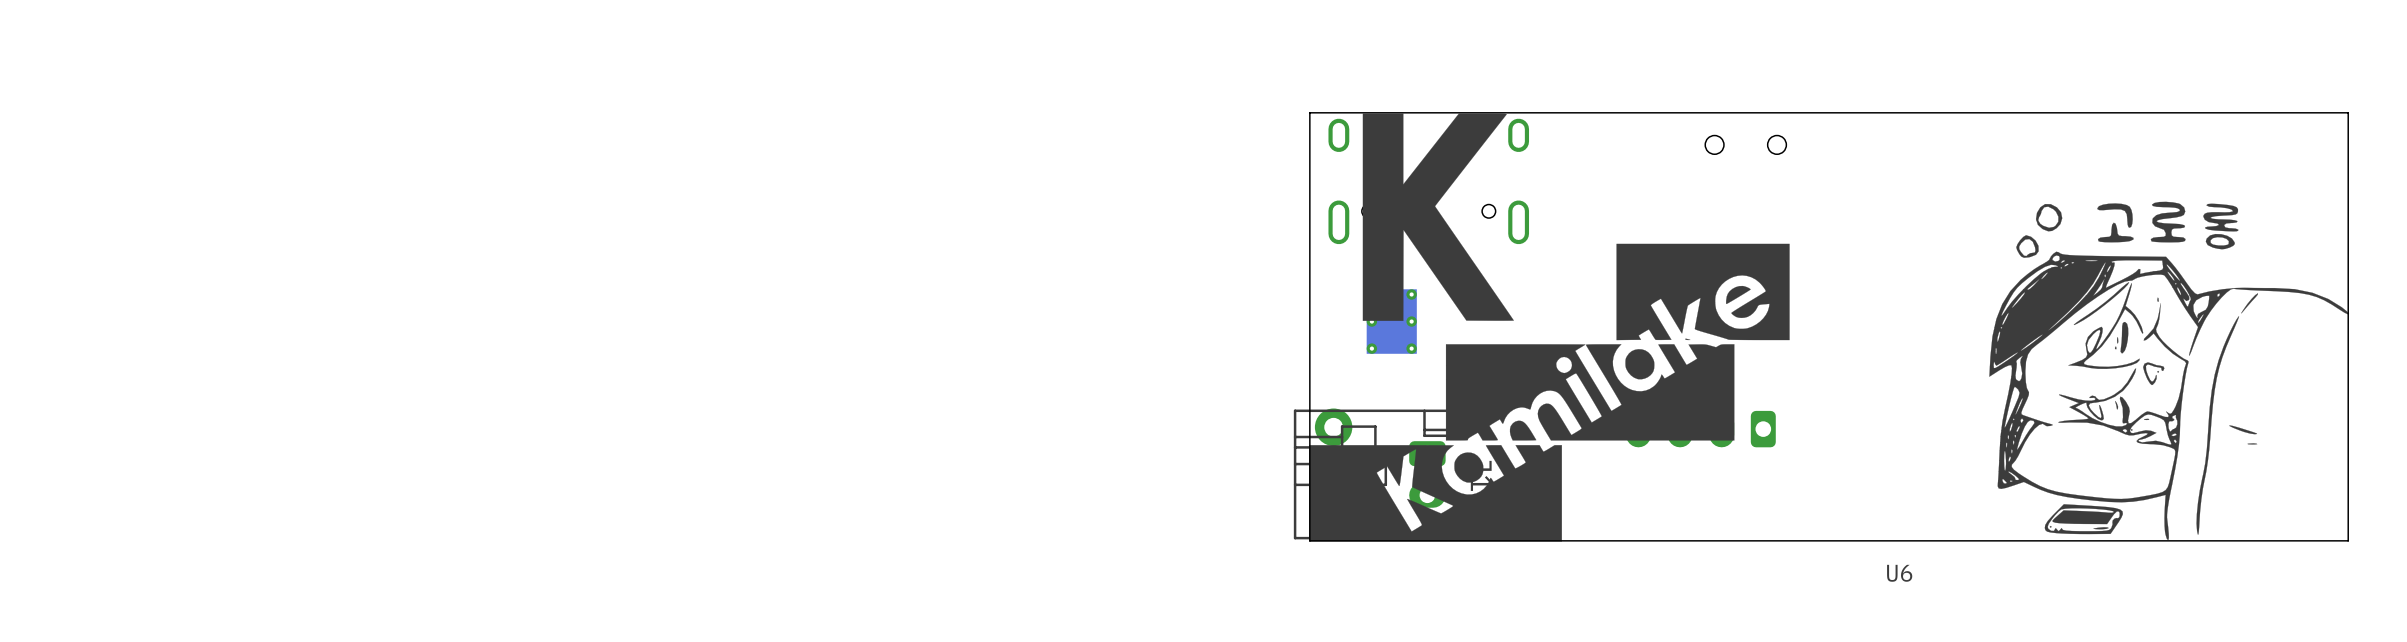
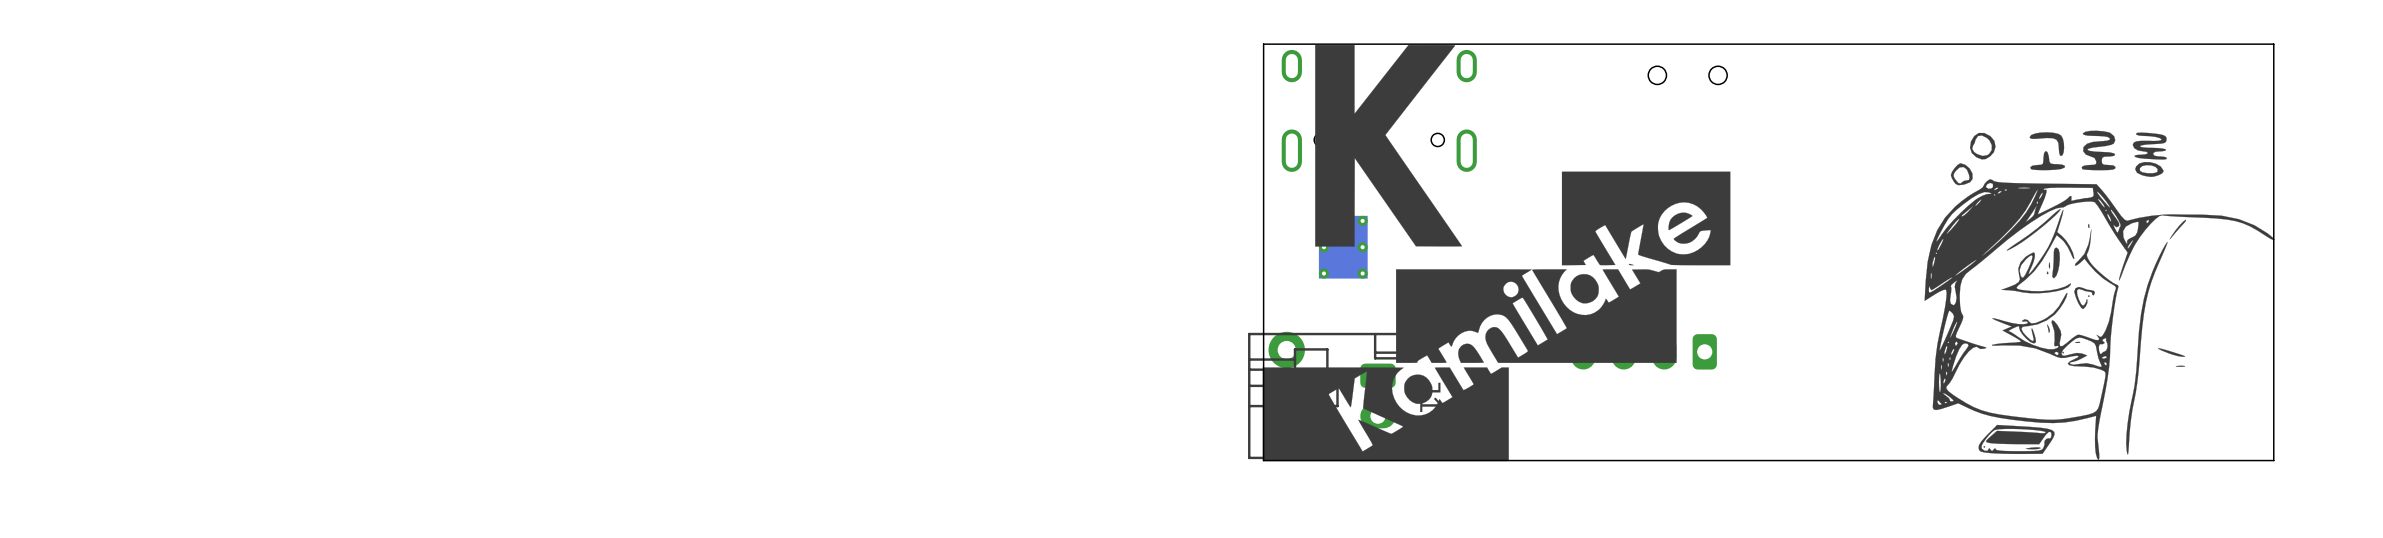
U6: (1899, 573) -> none

